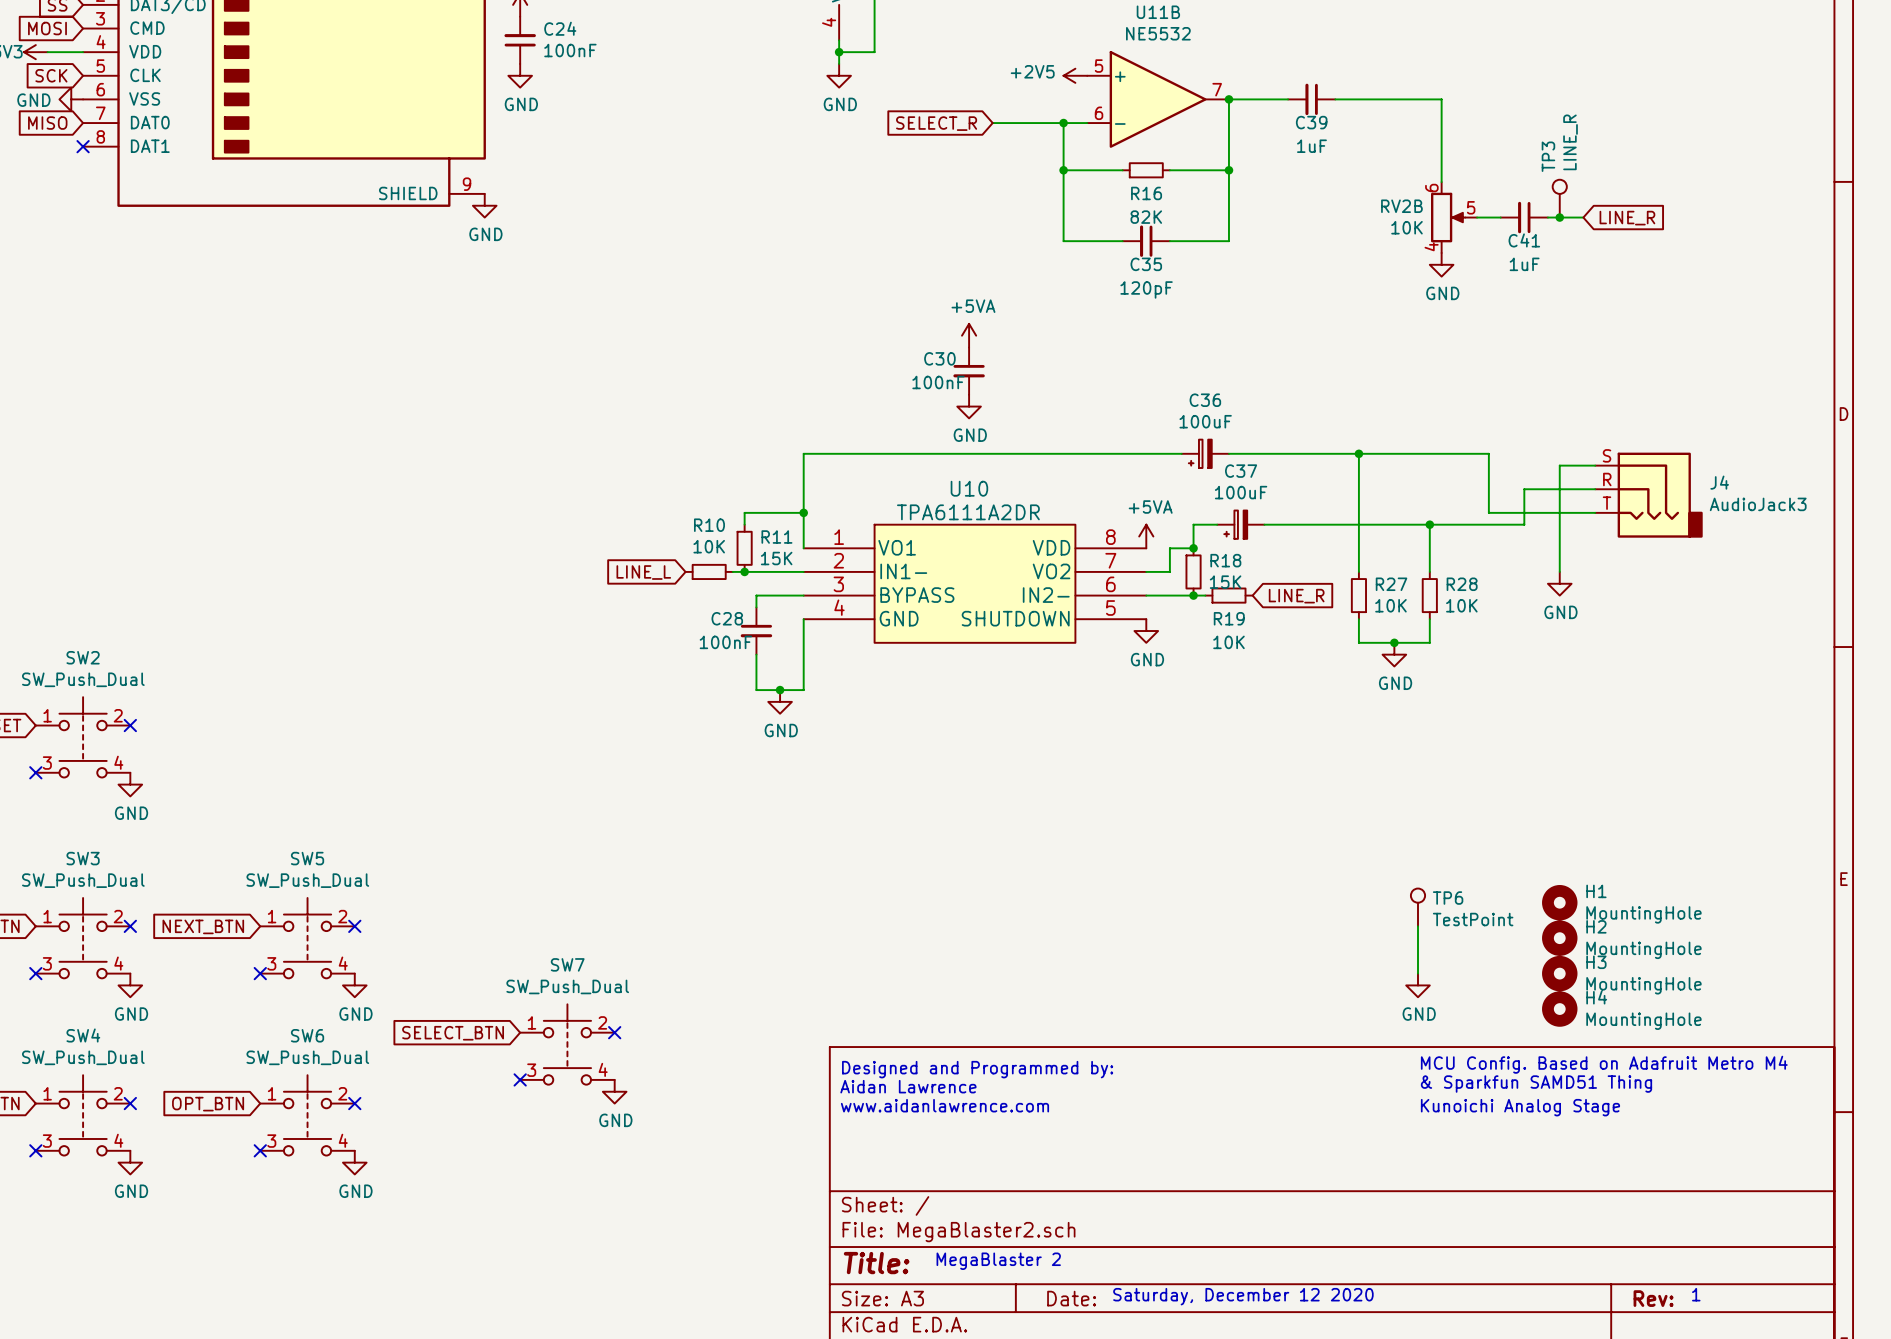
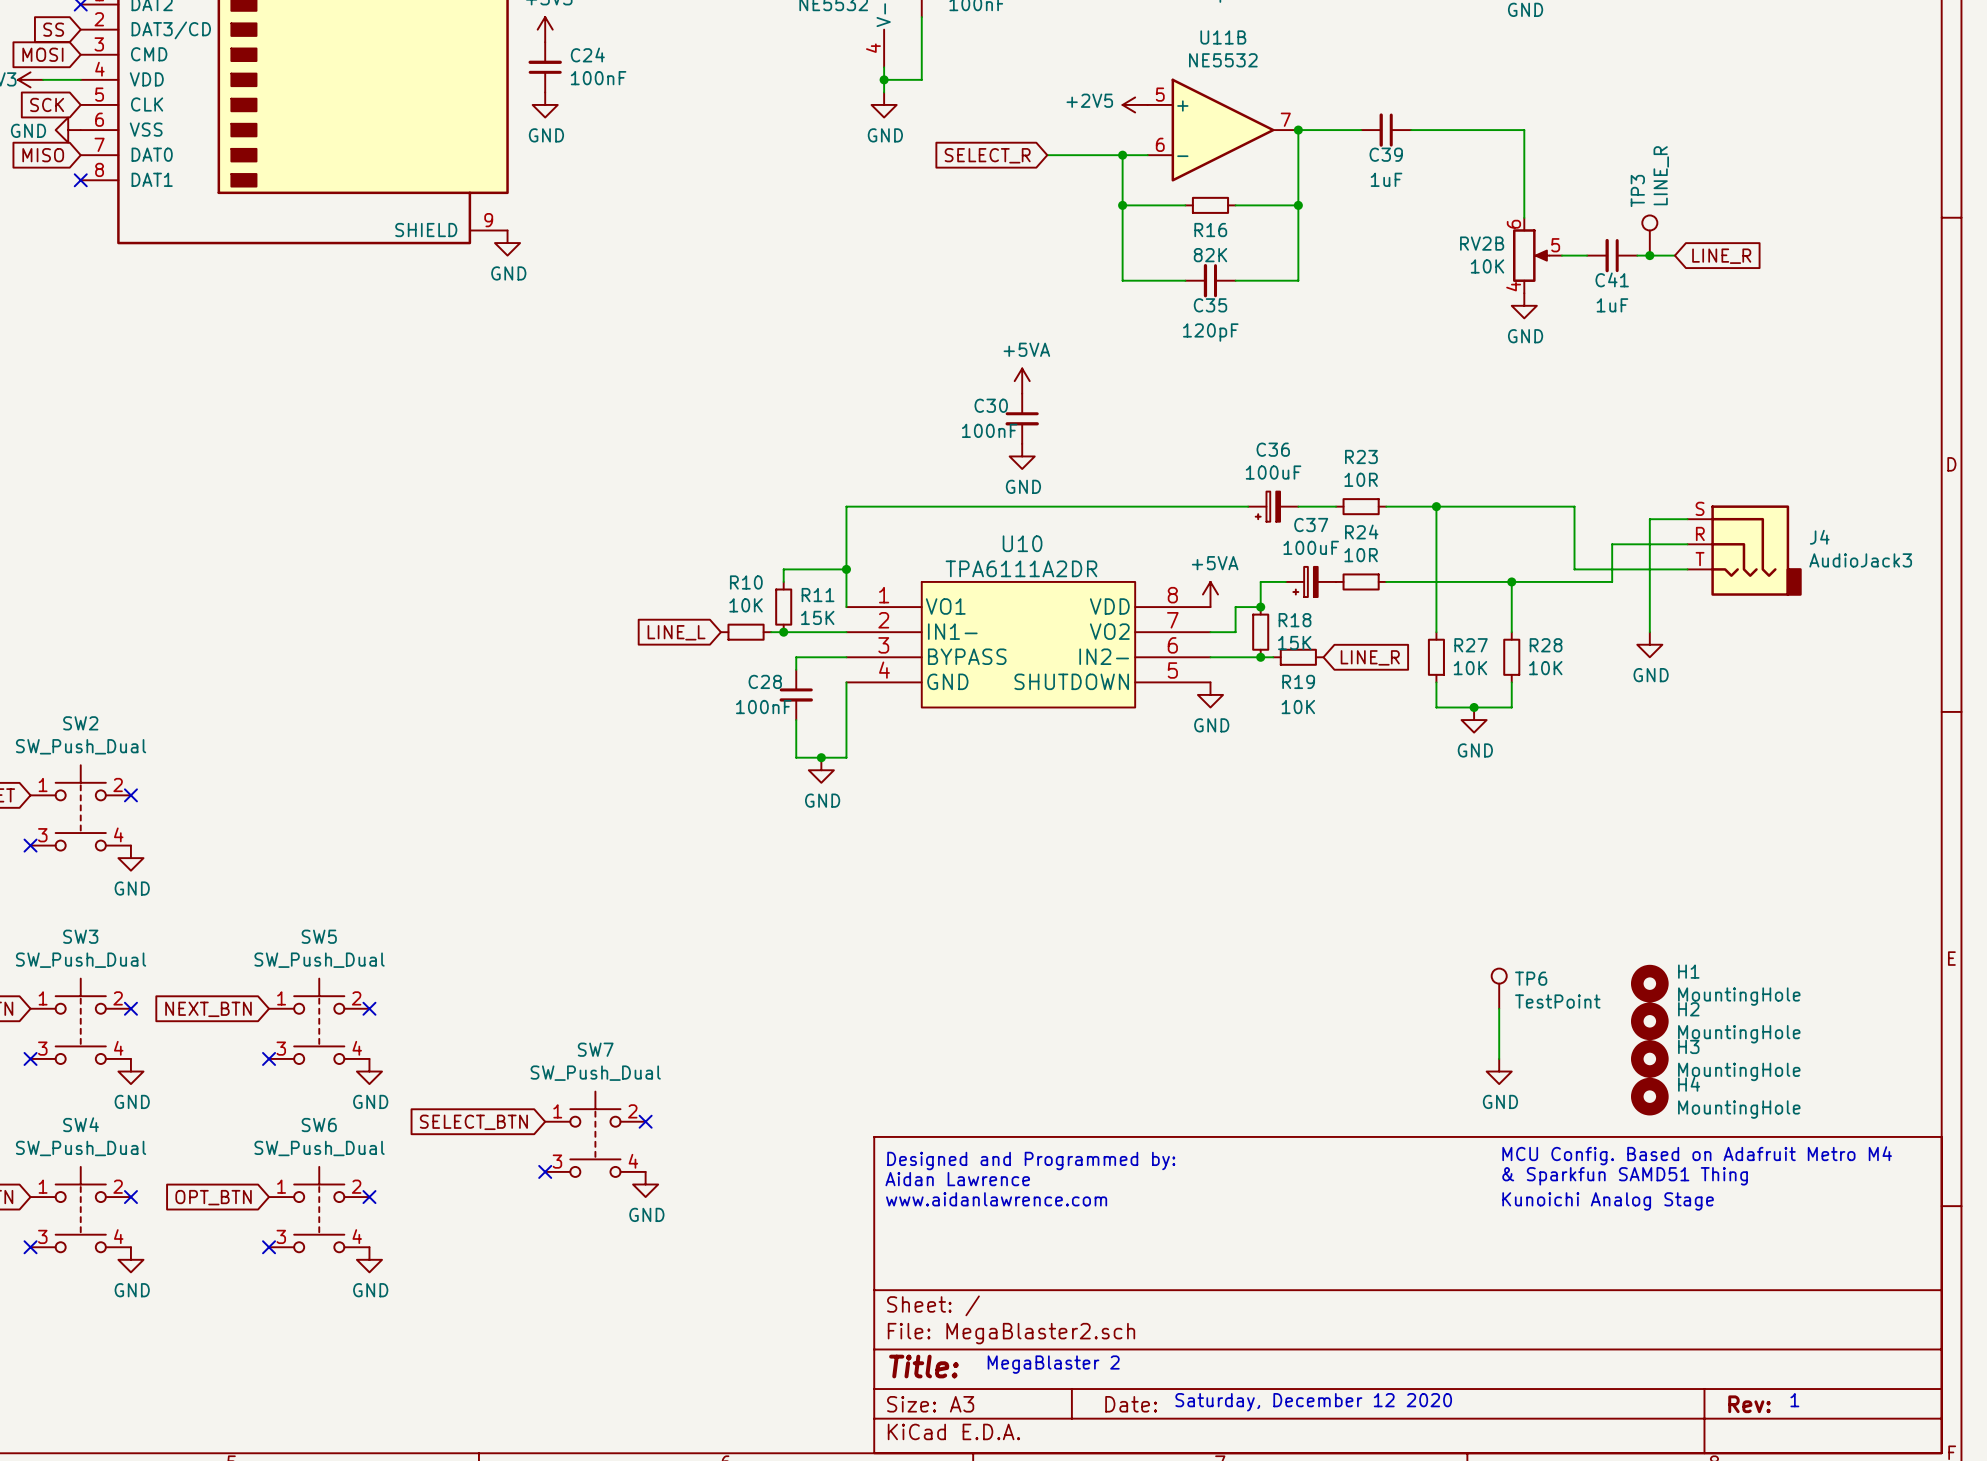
wire: (1264, 453) (1311, 453) -> none
R23: none -> 10R (1361, 506)
wire: (1264, 524) (1311, 524) -> none
R24: none -> 10R (1361, 581)

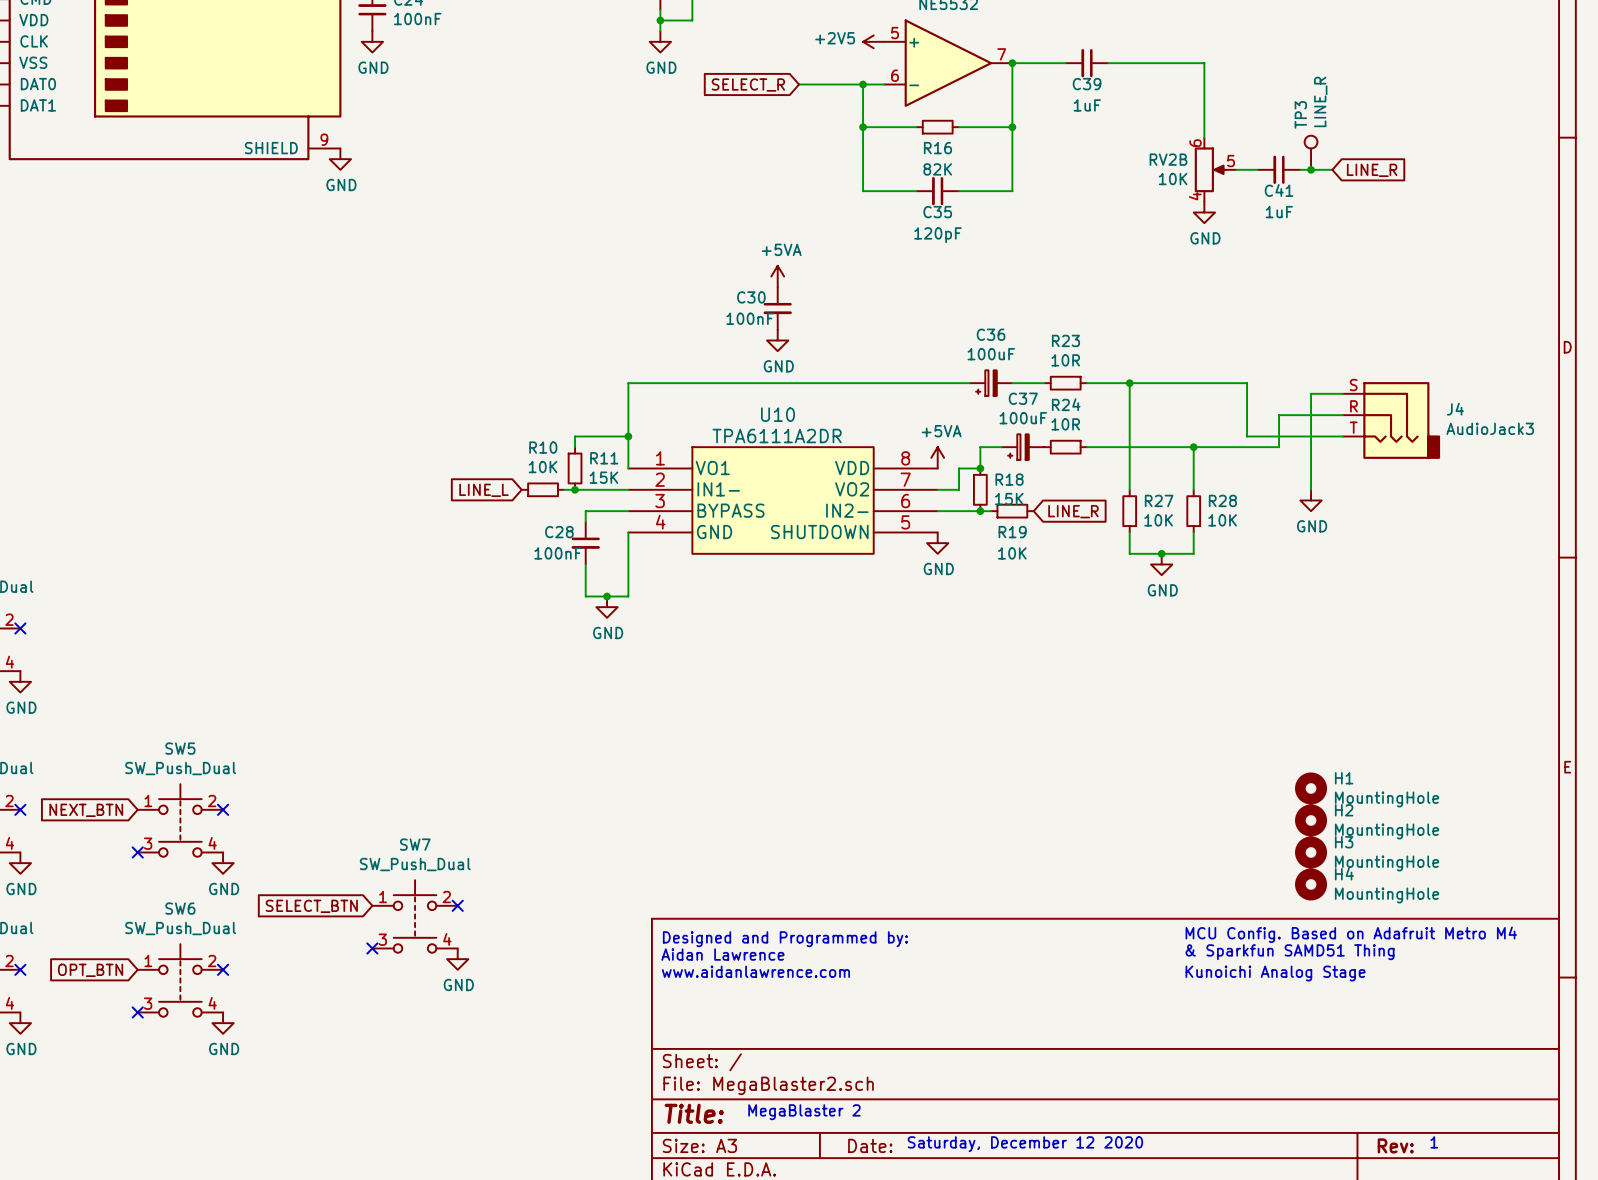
TP6: TestPoint (1499, 988) -> none
wire: (1499, 1008) (1499, 1058) -> none
power symbol: GND (1499, 1071) -> none

